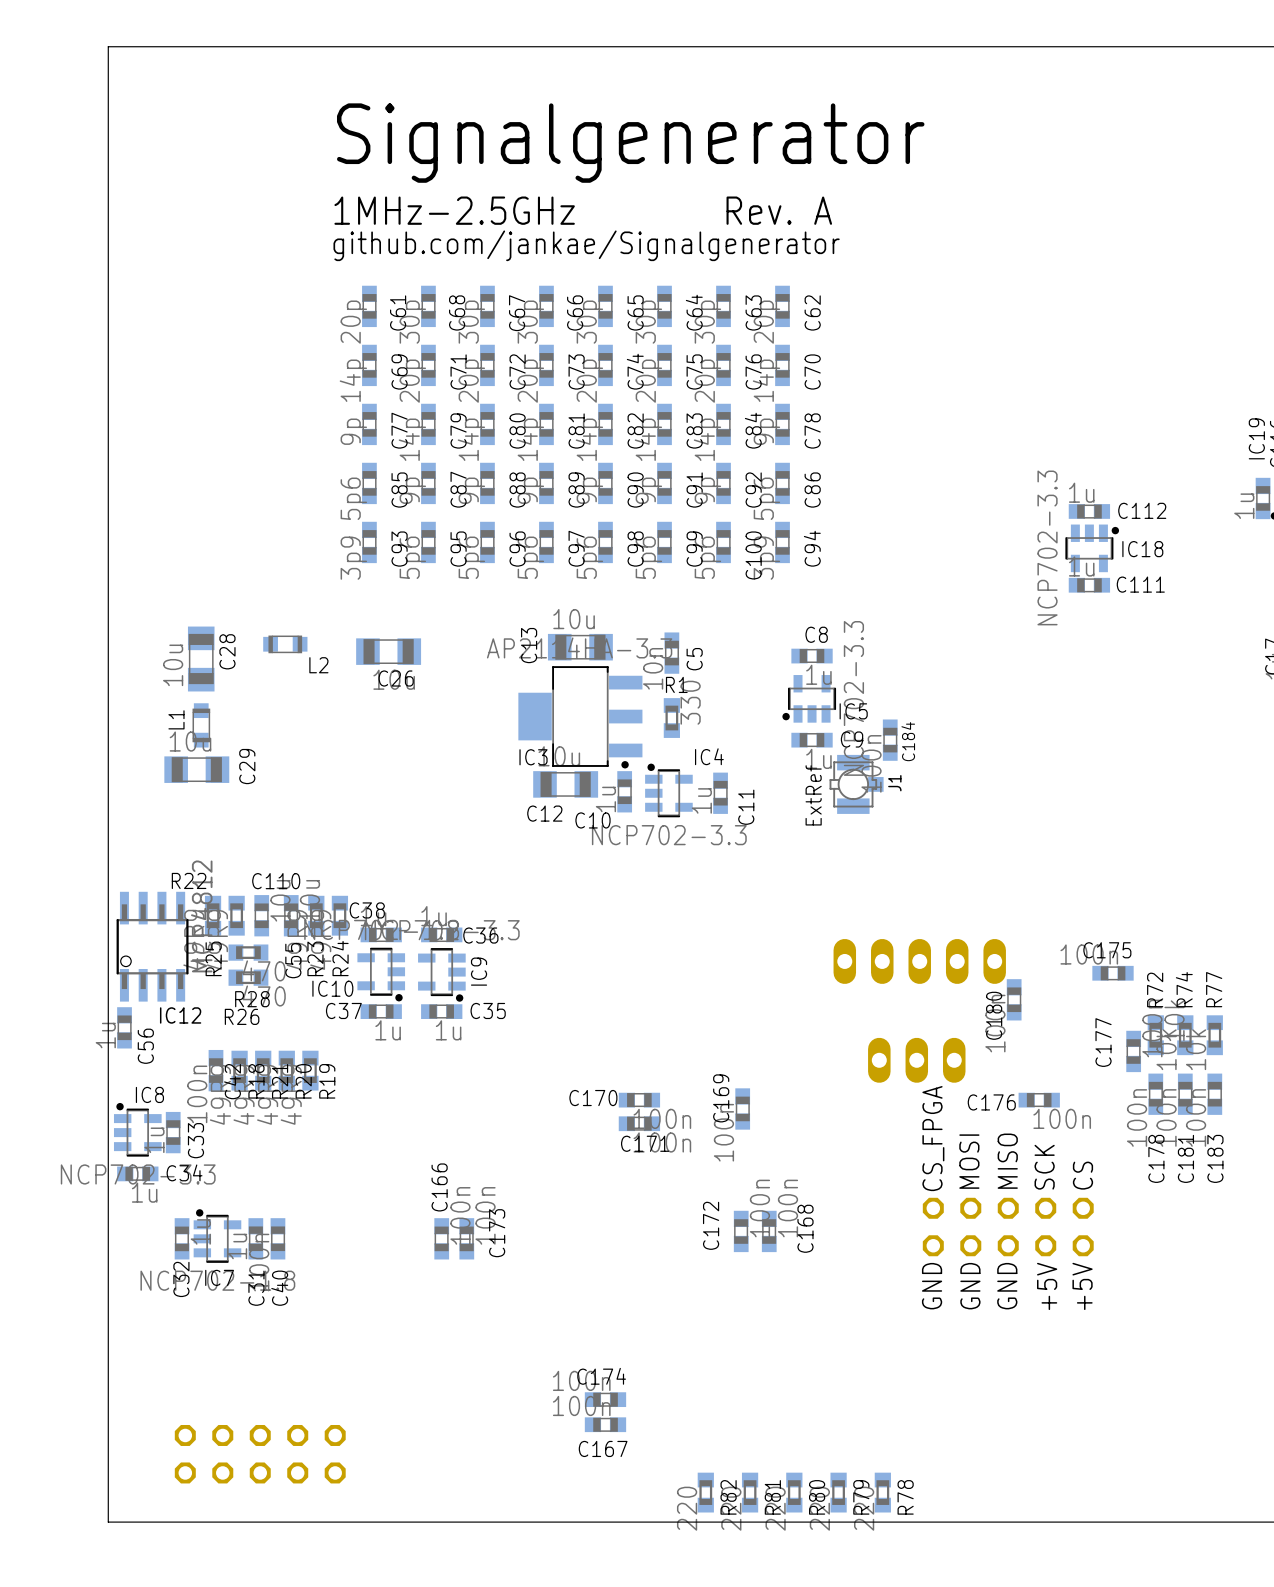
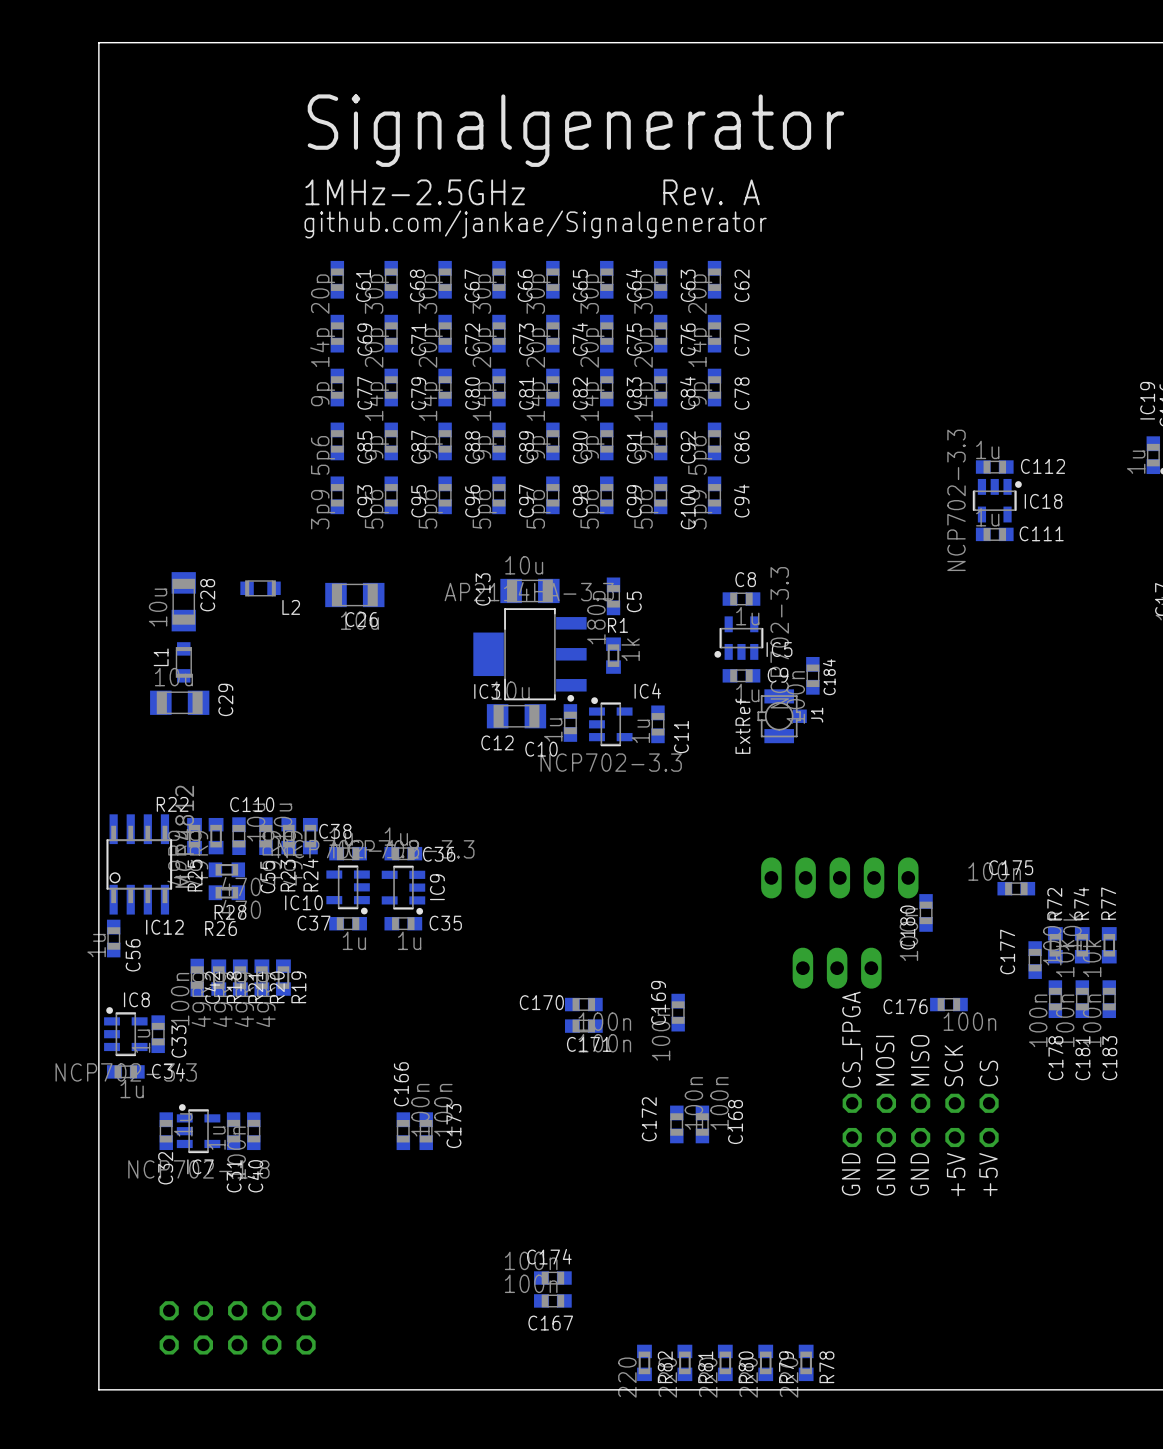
C5 value: 10n (653, 668) -> 180p (599, 617)
R1 value: 330 (690, 702) -> 1k (630, 649)

